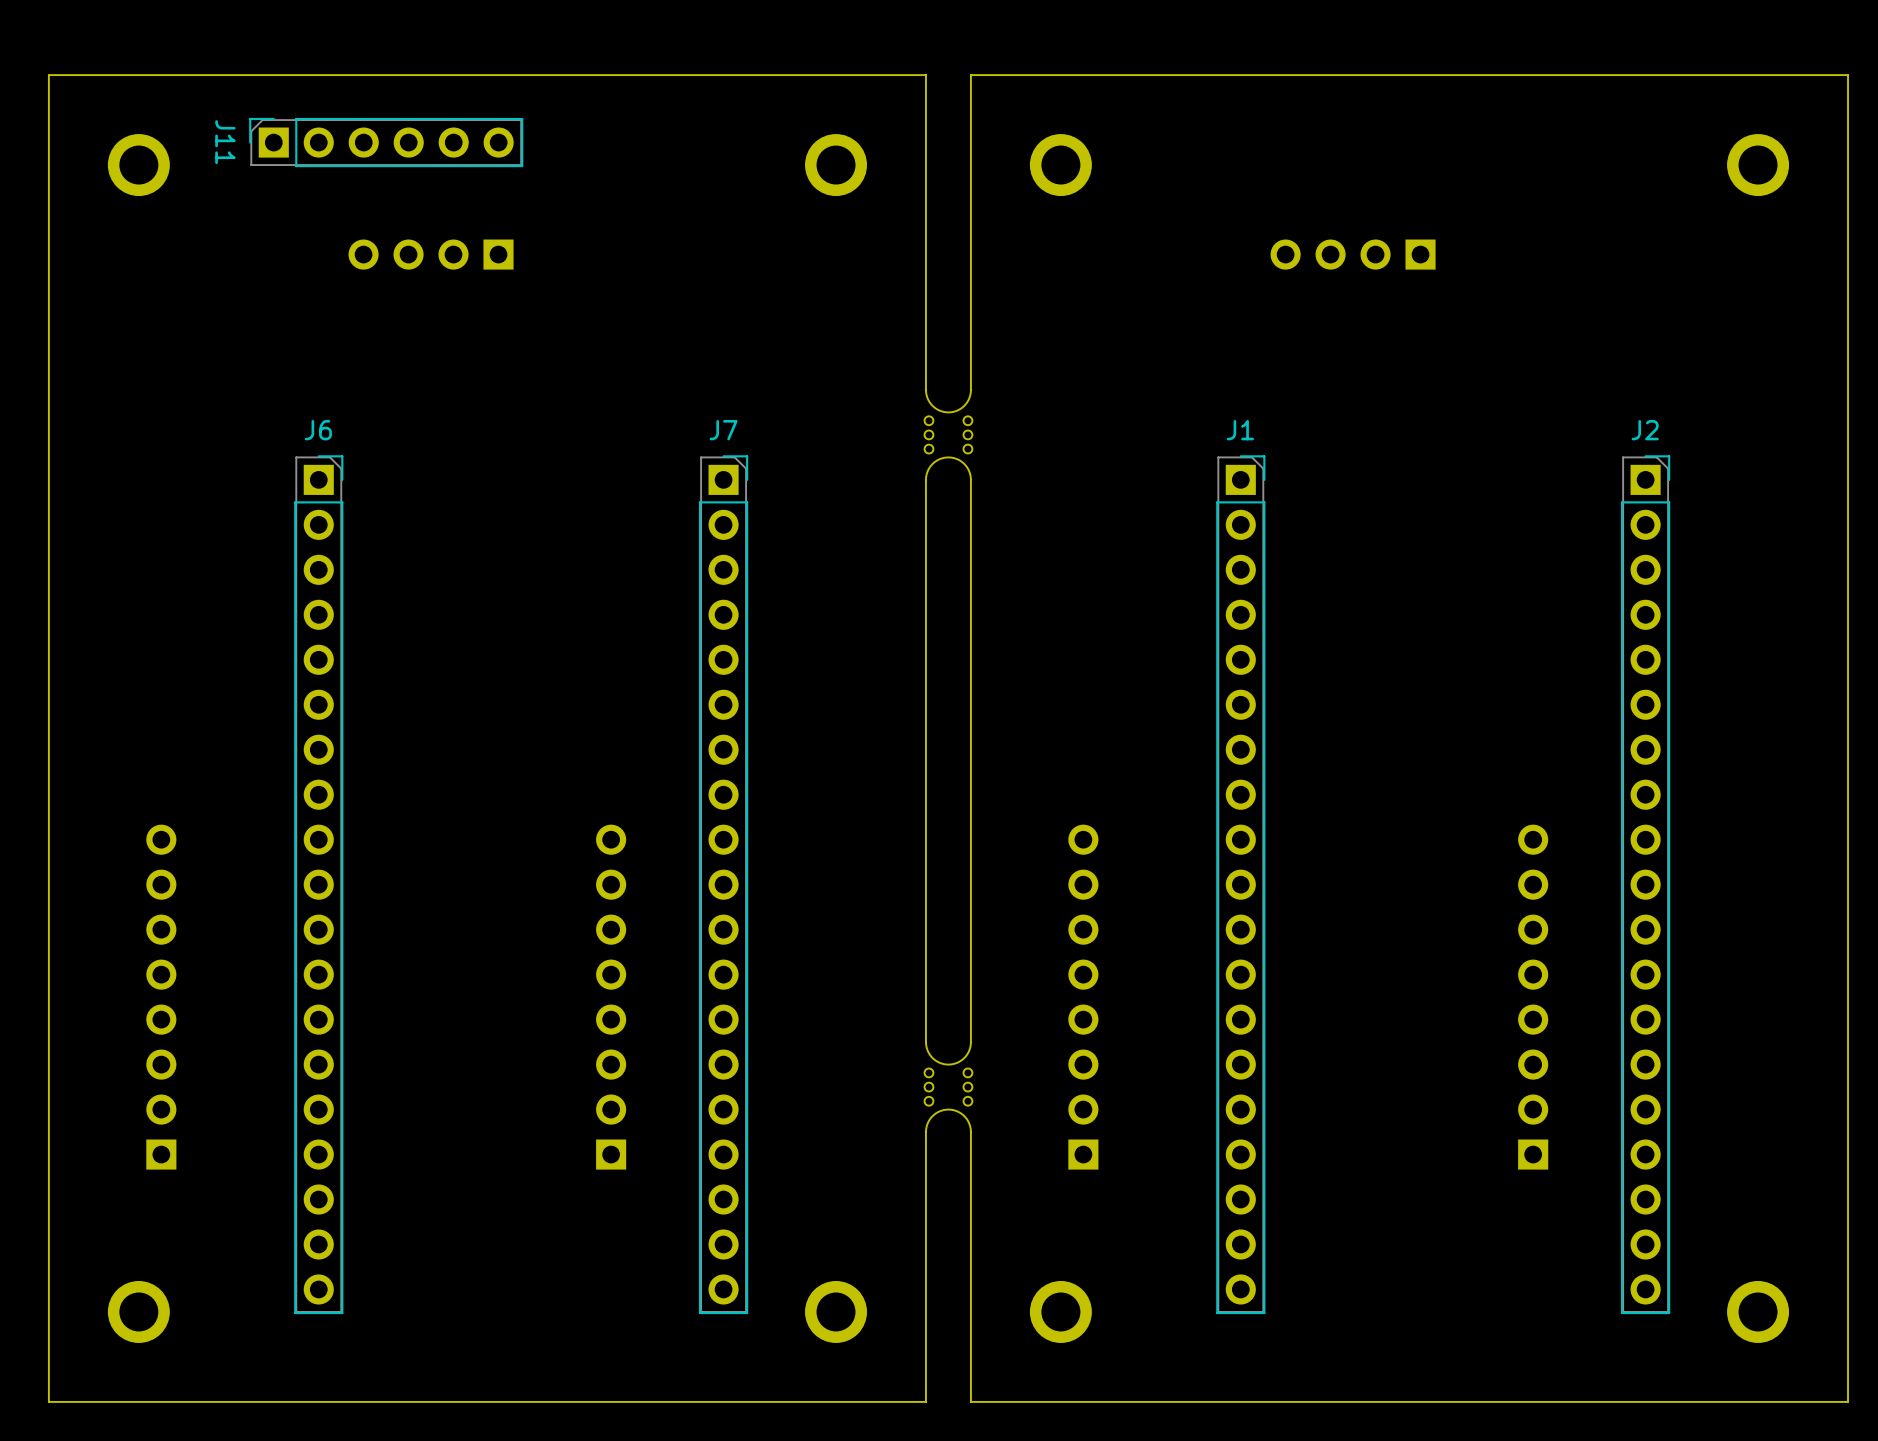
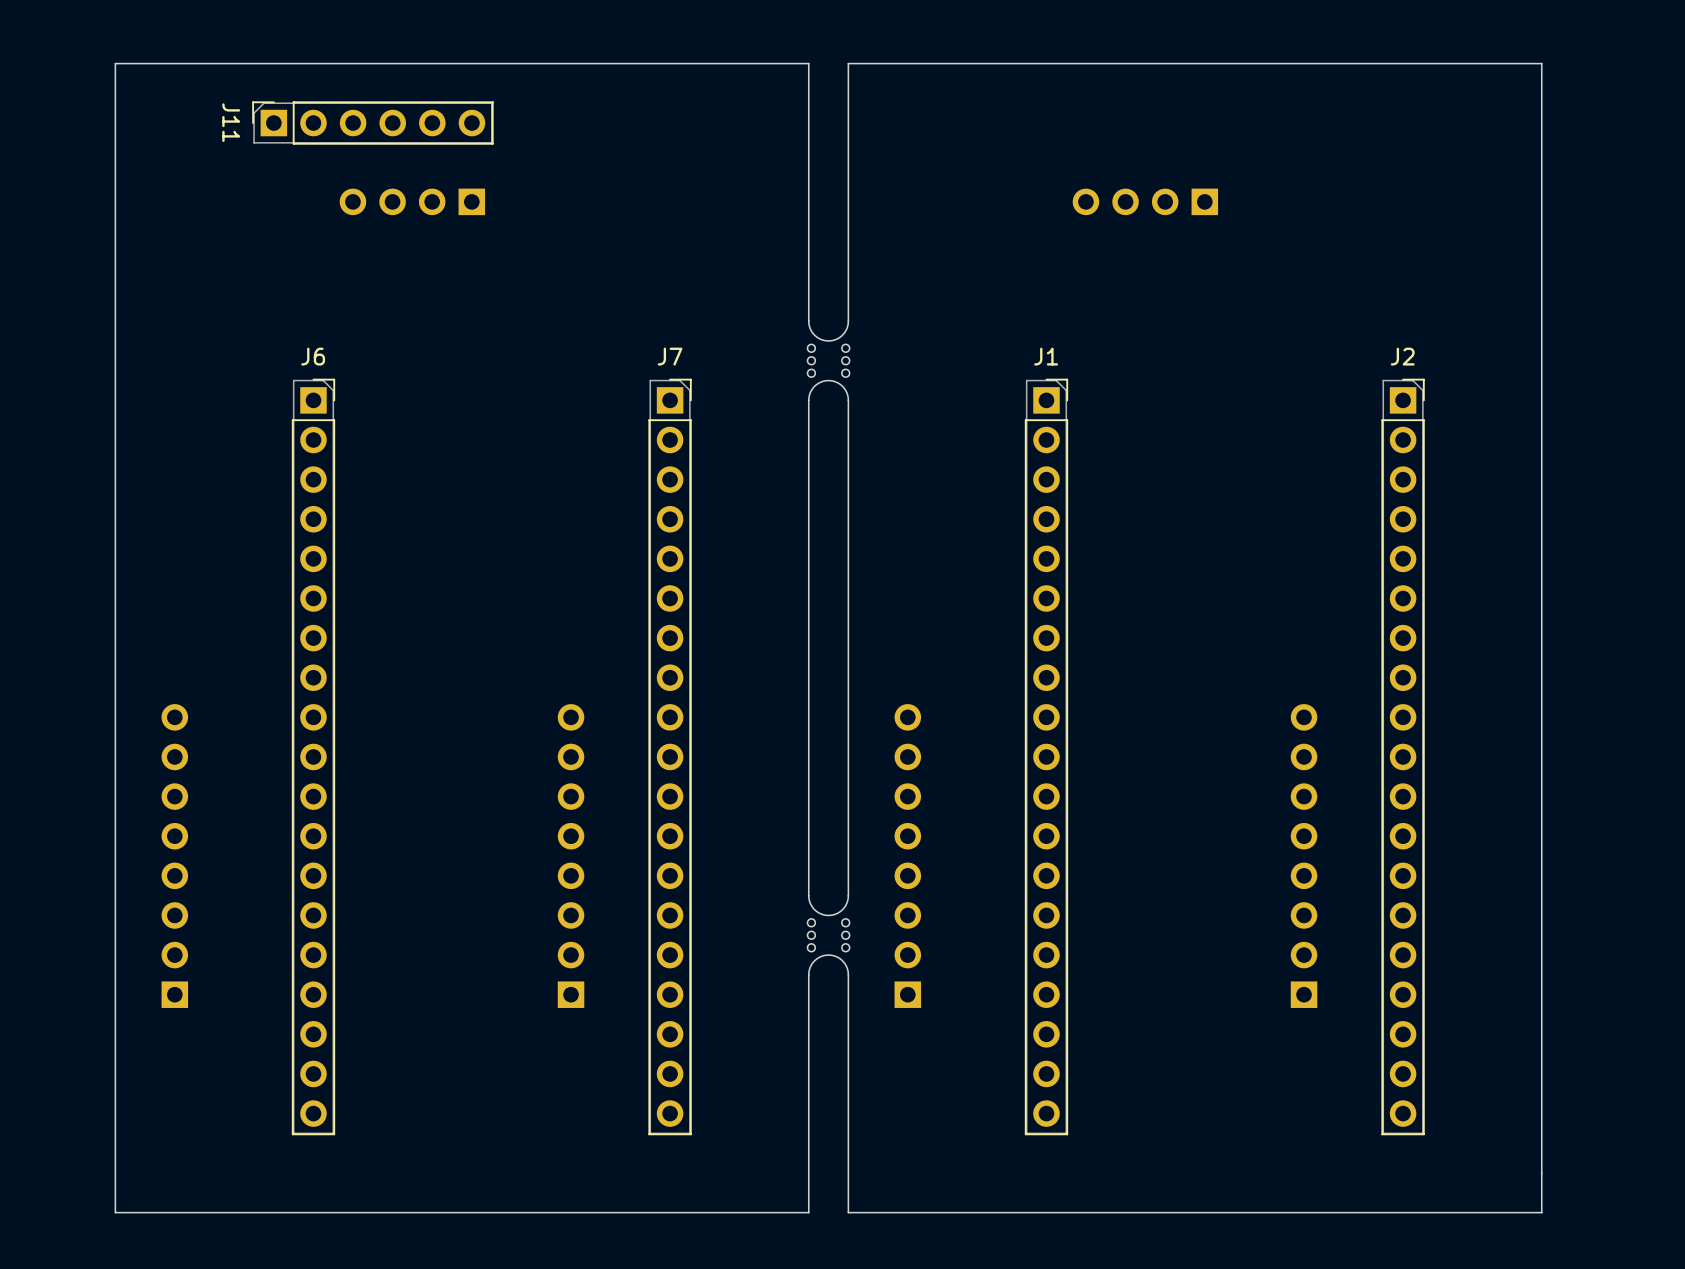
board edge: (925, 97) (925, 75) (48, 75) (48, 1401) (138, 1401) -> (808, 63) (115, 63) (115, 1212)
board edge: (970, 97) (970, 75) (1848, 75) (1848, 1401) (1758, 1401) -> (848, 63) (1541, 63) (1541, 1212)
J11 position: (386, 142) -> (372, 123)
part: (138, 165) -> none
part: (836, 165) -> none
part: (1060, 165) -> none
part: (1758, 165) -> none
part position: (431, 254) -> (412, 201)
part position: (1353, 254) -> (1145, 201)
J6 position: (318, 884) -> (313, 756)
J7 position: (723, 884) -> (670, 756)
J1 position: (1240, 884) -> (1046, 756)
J2 position: (1645, 884) -> (1403, 756)
part position: (161, 997) -> (174, 856)
part position: (611, 997) -> (571, 856)
part position: (1083, 997) -> (907, 856)
part position: (1533, 997) -> (1304, 856)
part: (138, 1311) -> none
part: (836, 1311) -> none
part: (1060, 1311) -> none
part: (1758, 1311) -> none

